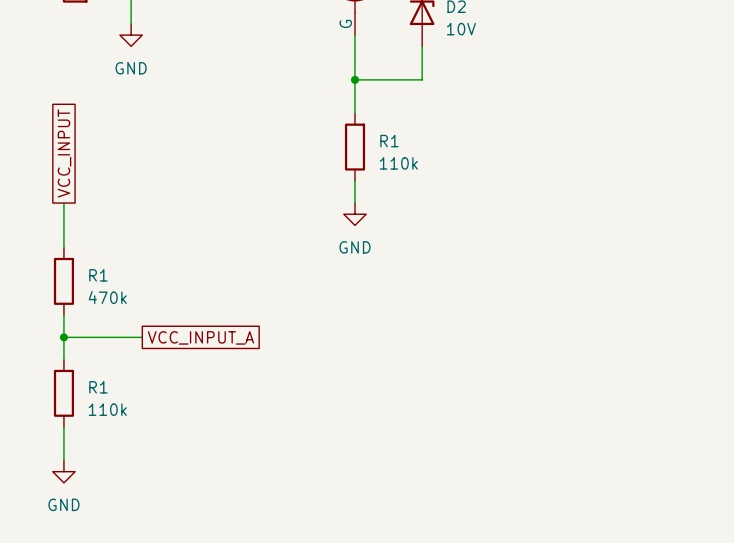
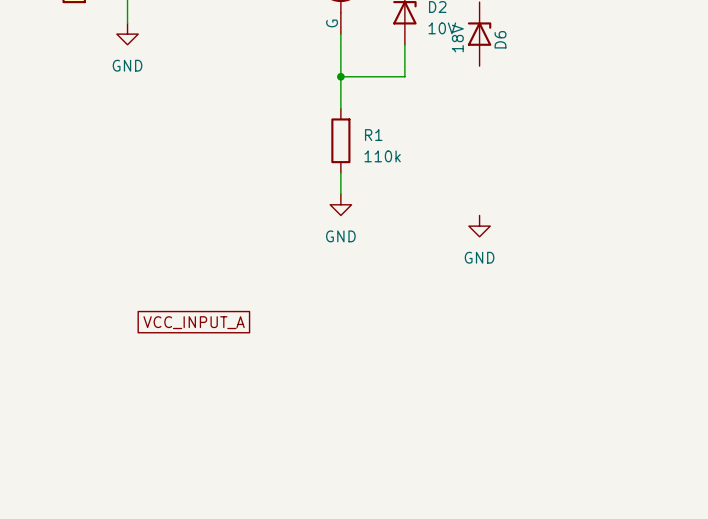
D6: none -> 18V (479, 34)
global label: VCC_INPUT (64, 153) -> none
wire: (63, 203) (63, 247) -> none
power symbol: none -> GND (479, 226)
R1: 470k (63, 281) -> none
wire: (63, 314) (63, 359) -> none
wire: (63, 337) (142, 337) -> none
junction: (63, 337) -> none
R1: 110k (63, 393) -> none
wire: (63, 426) (63, 460) -> none
power symbol: GND (63, 471) -> none

